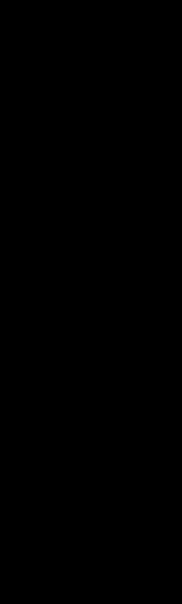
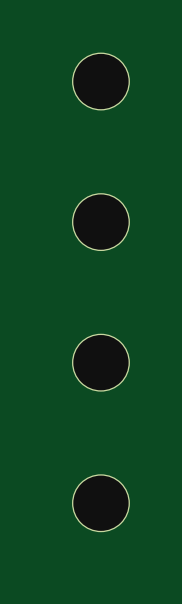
part: none -> (100, 81)
part: none -> (100, 222)
part: none -> (100, 362)
part: none -> (100, 503)

